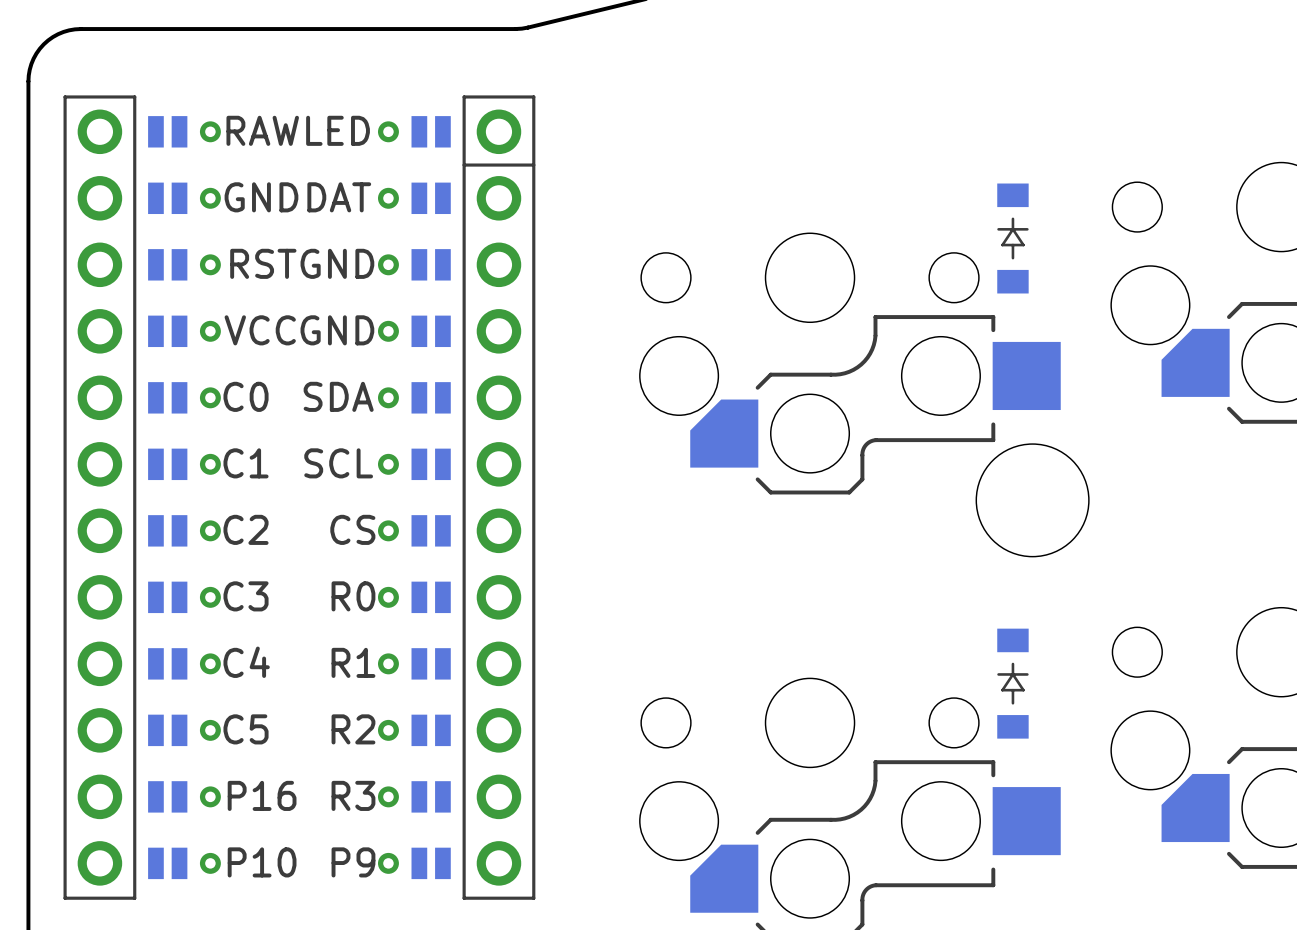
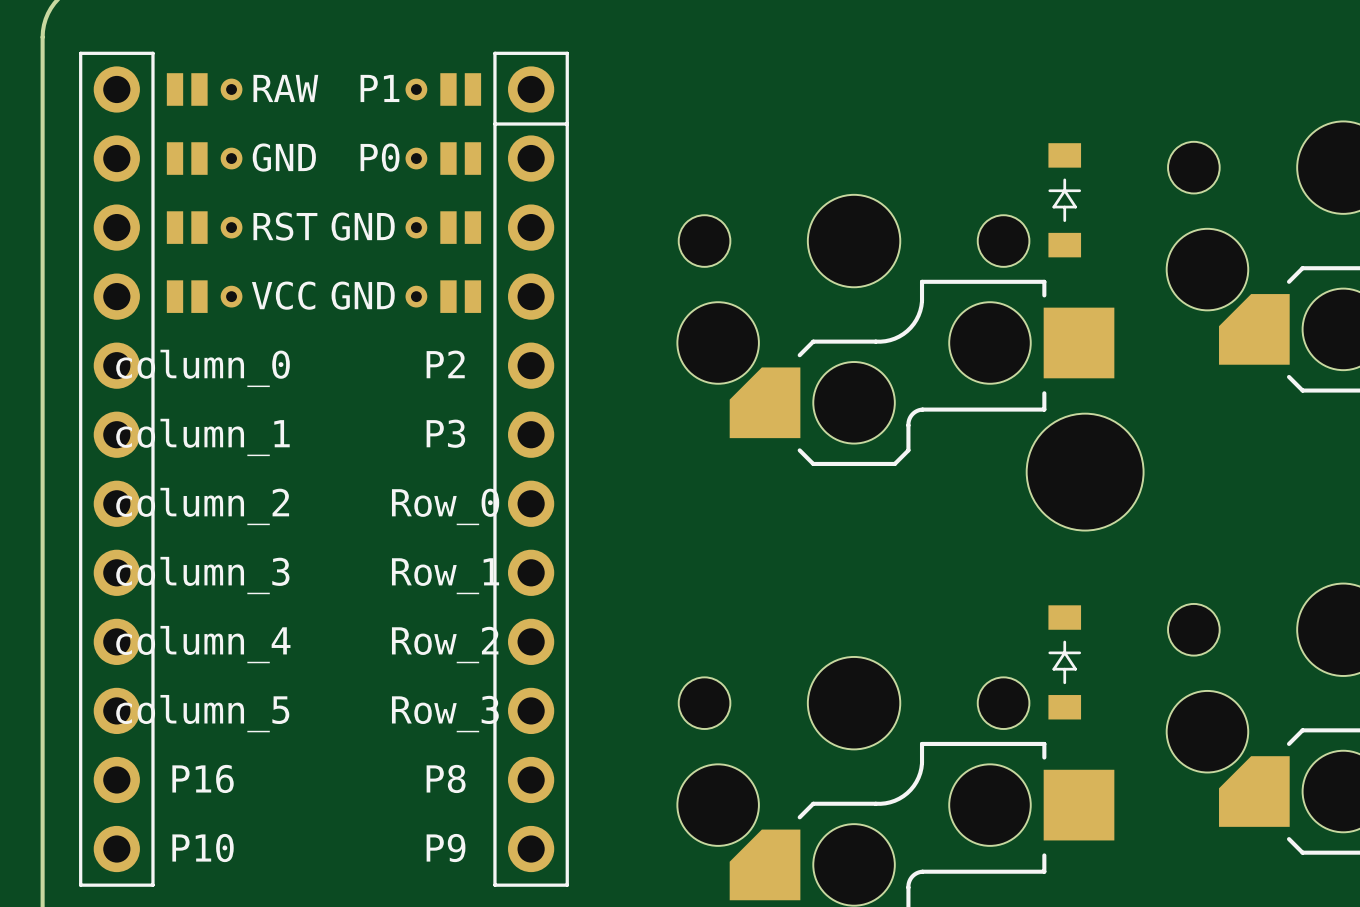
part footprint: [63, 95, 536, 900] -> [79, 51, 569, 887]

